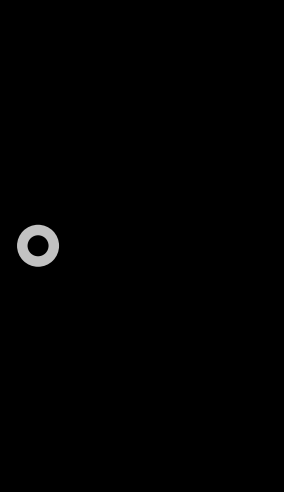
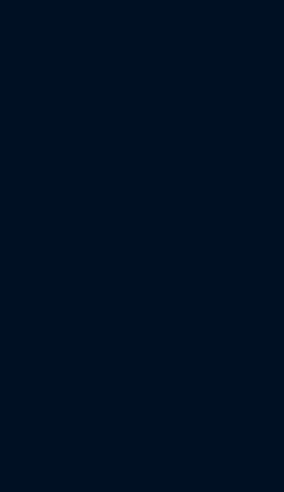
via: (38, 245) -> none

